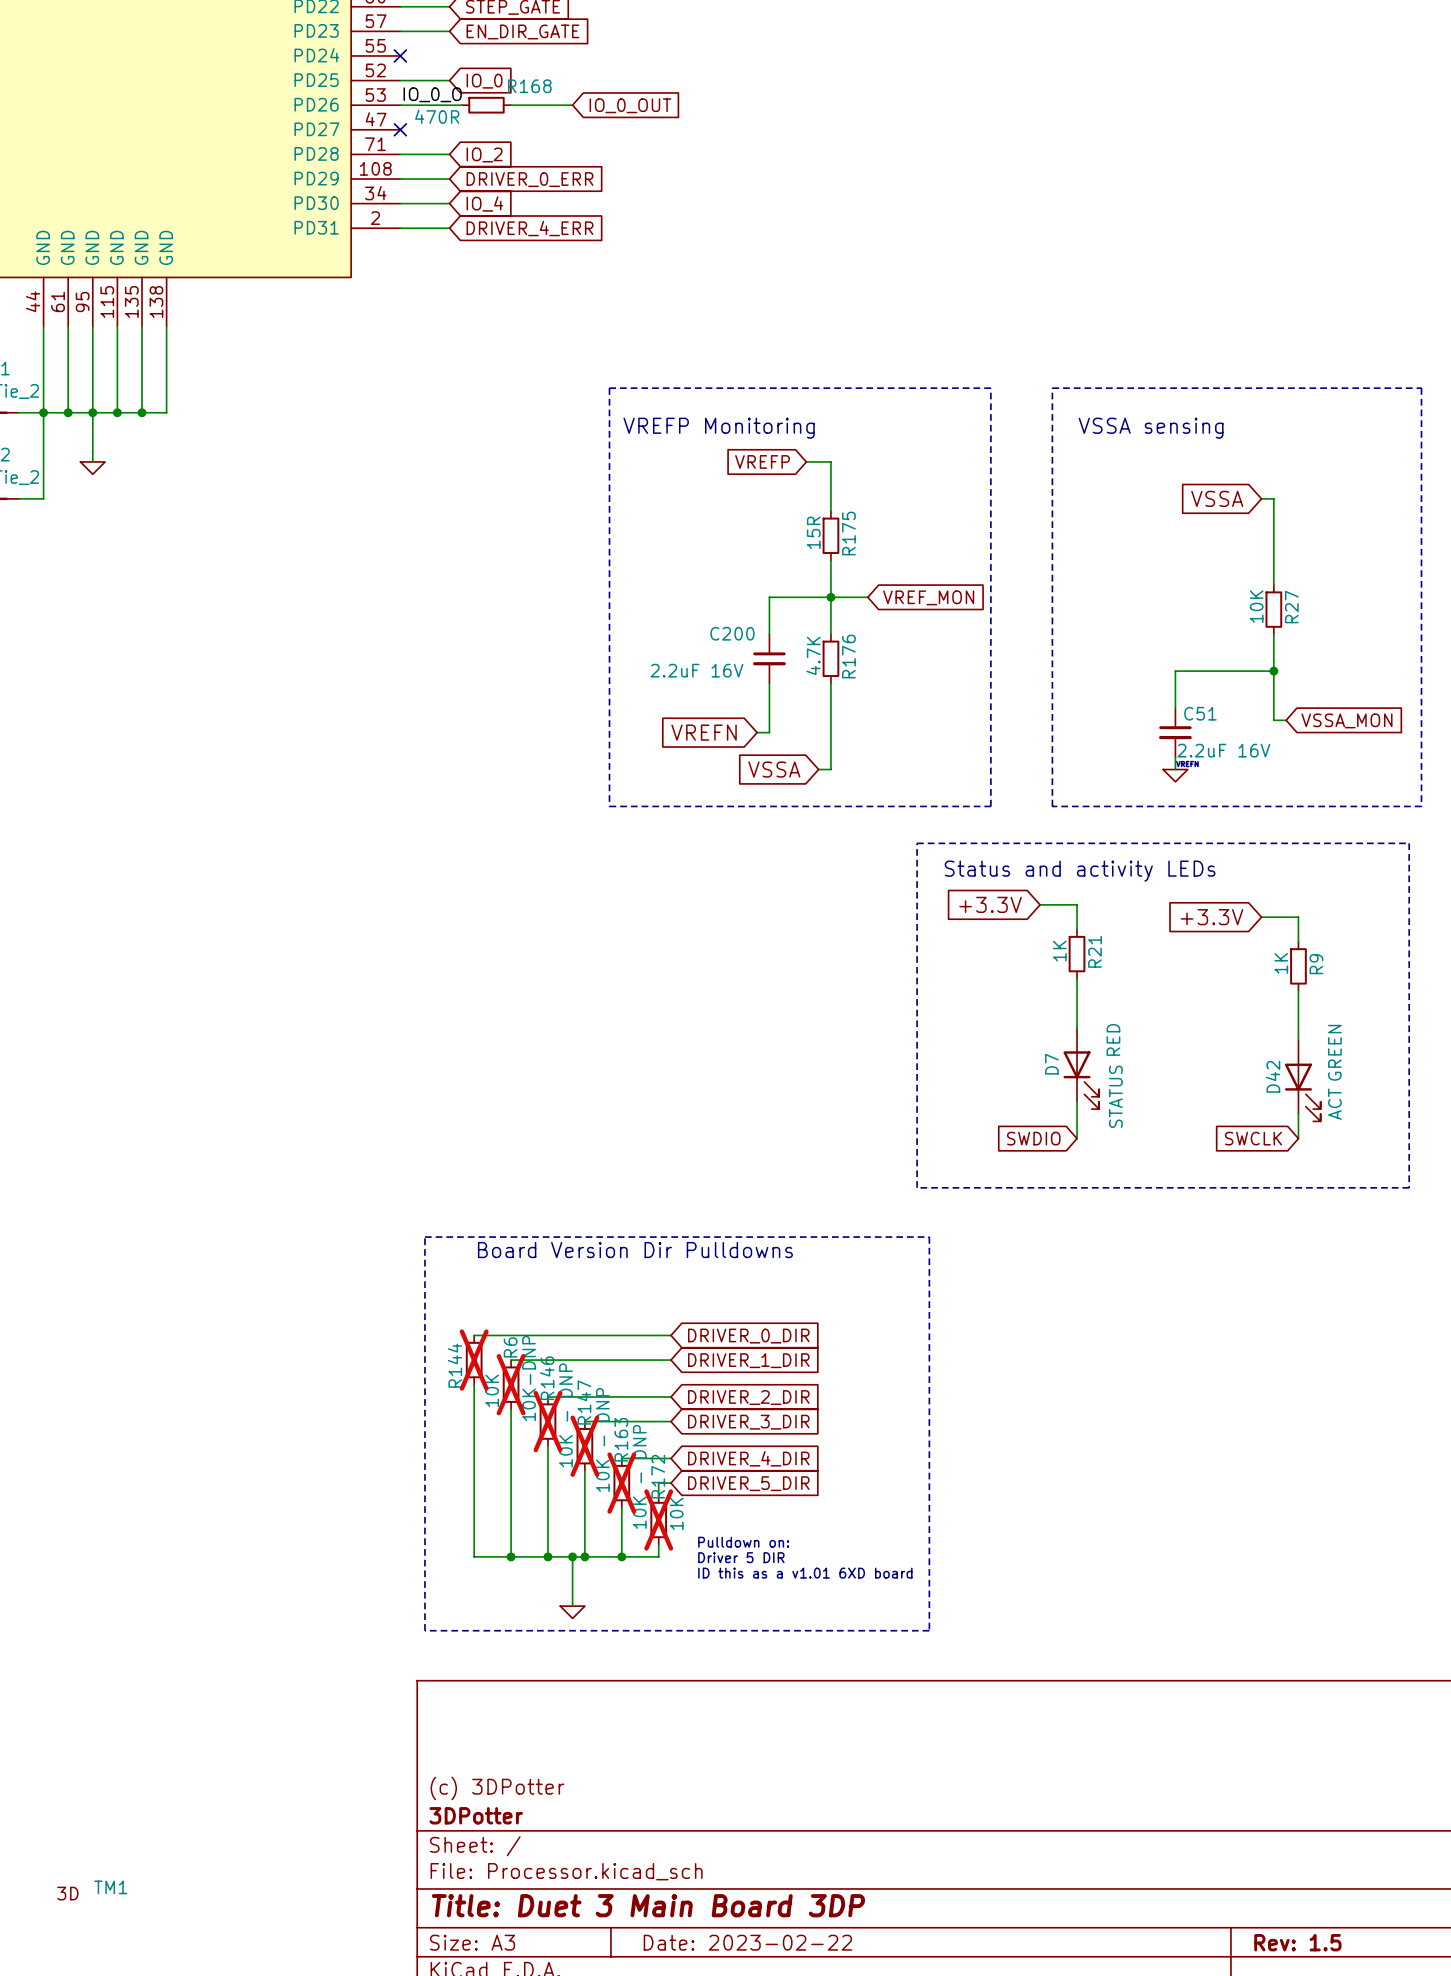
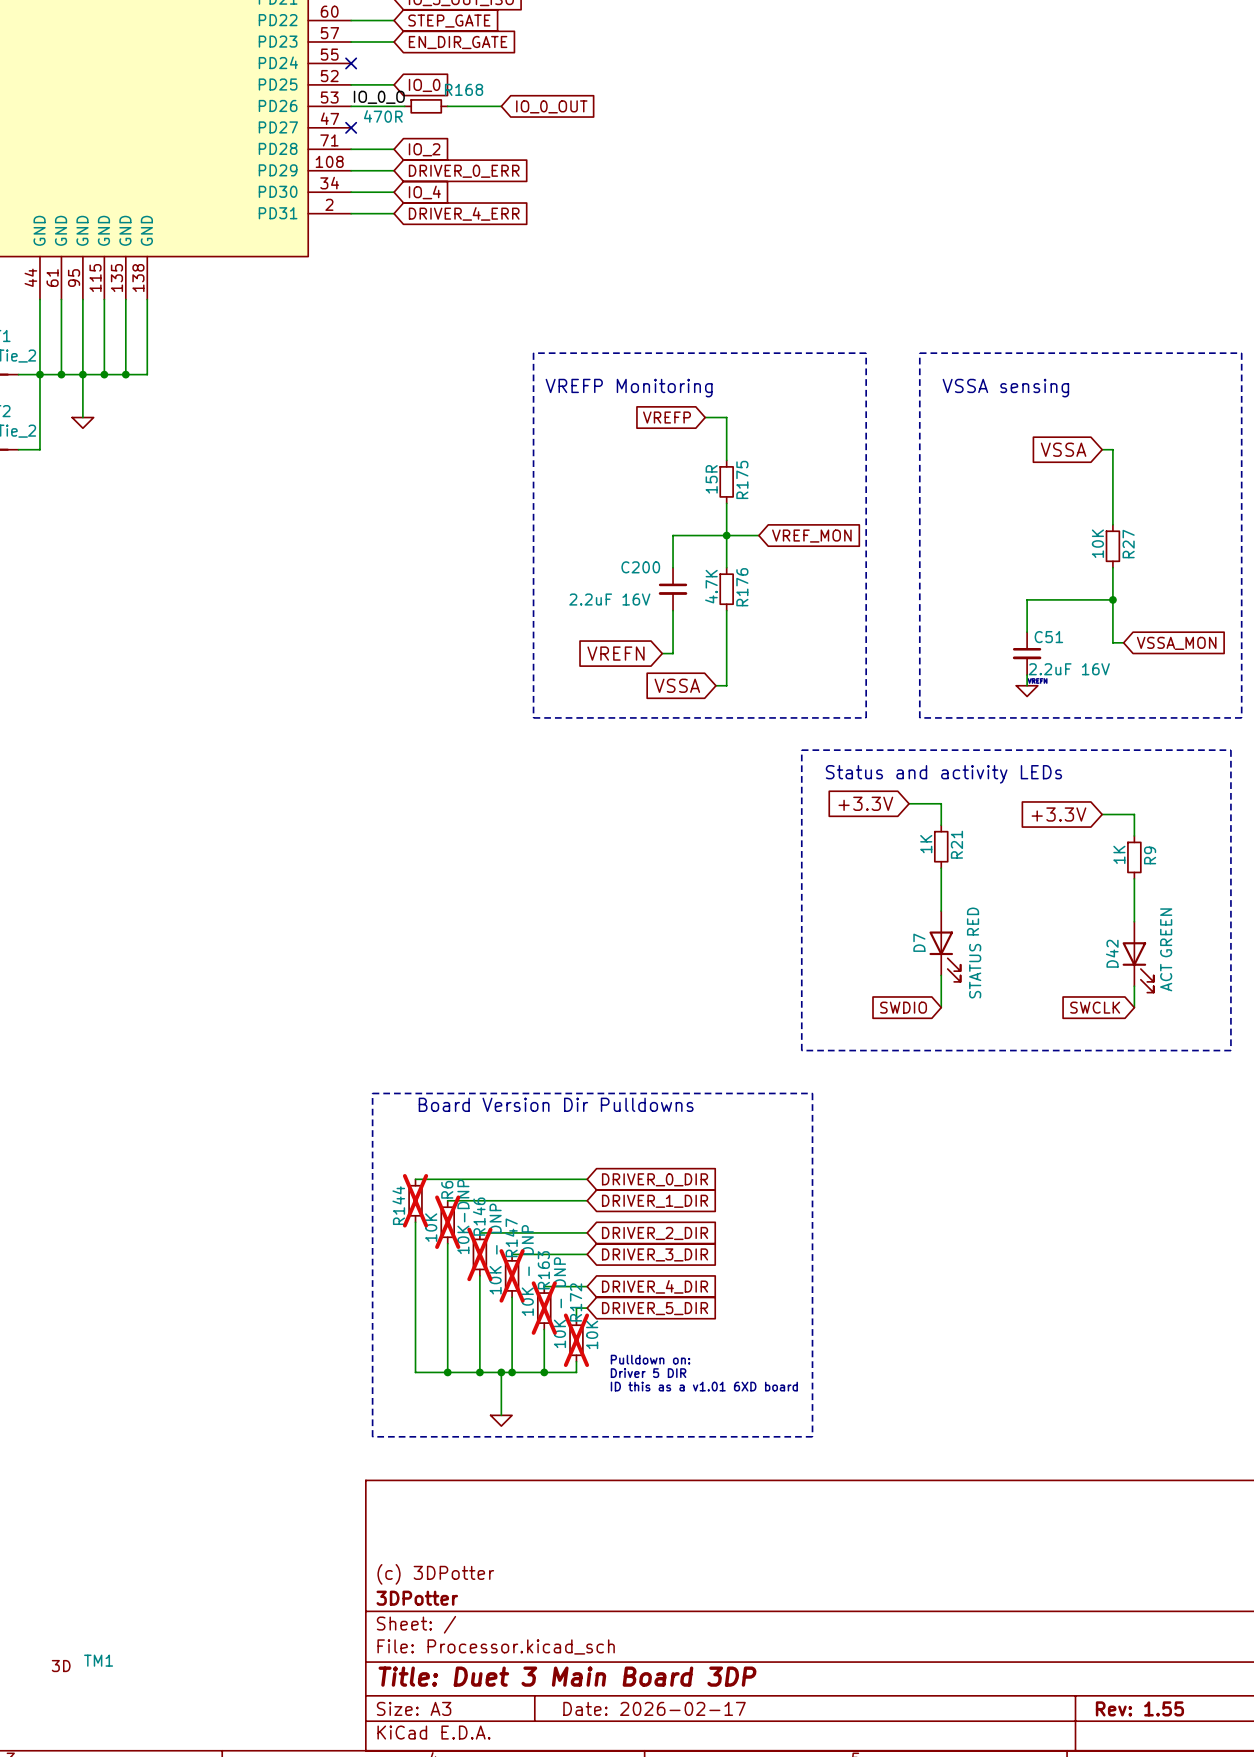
title block: Date: 2023-02-22 (747, 1942) -> Date: 2026-02-17 (654, 1708)
title block: Rev: 1.5 (1297, 1942) -> Rev: 1.55 (1139, 1708)

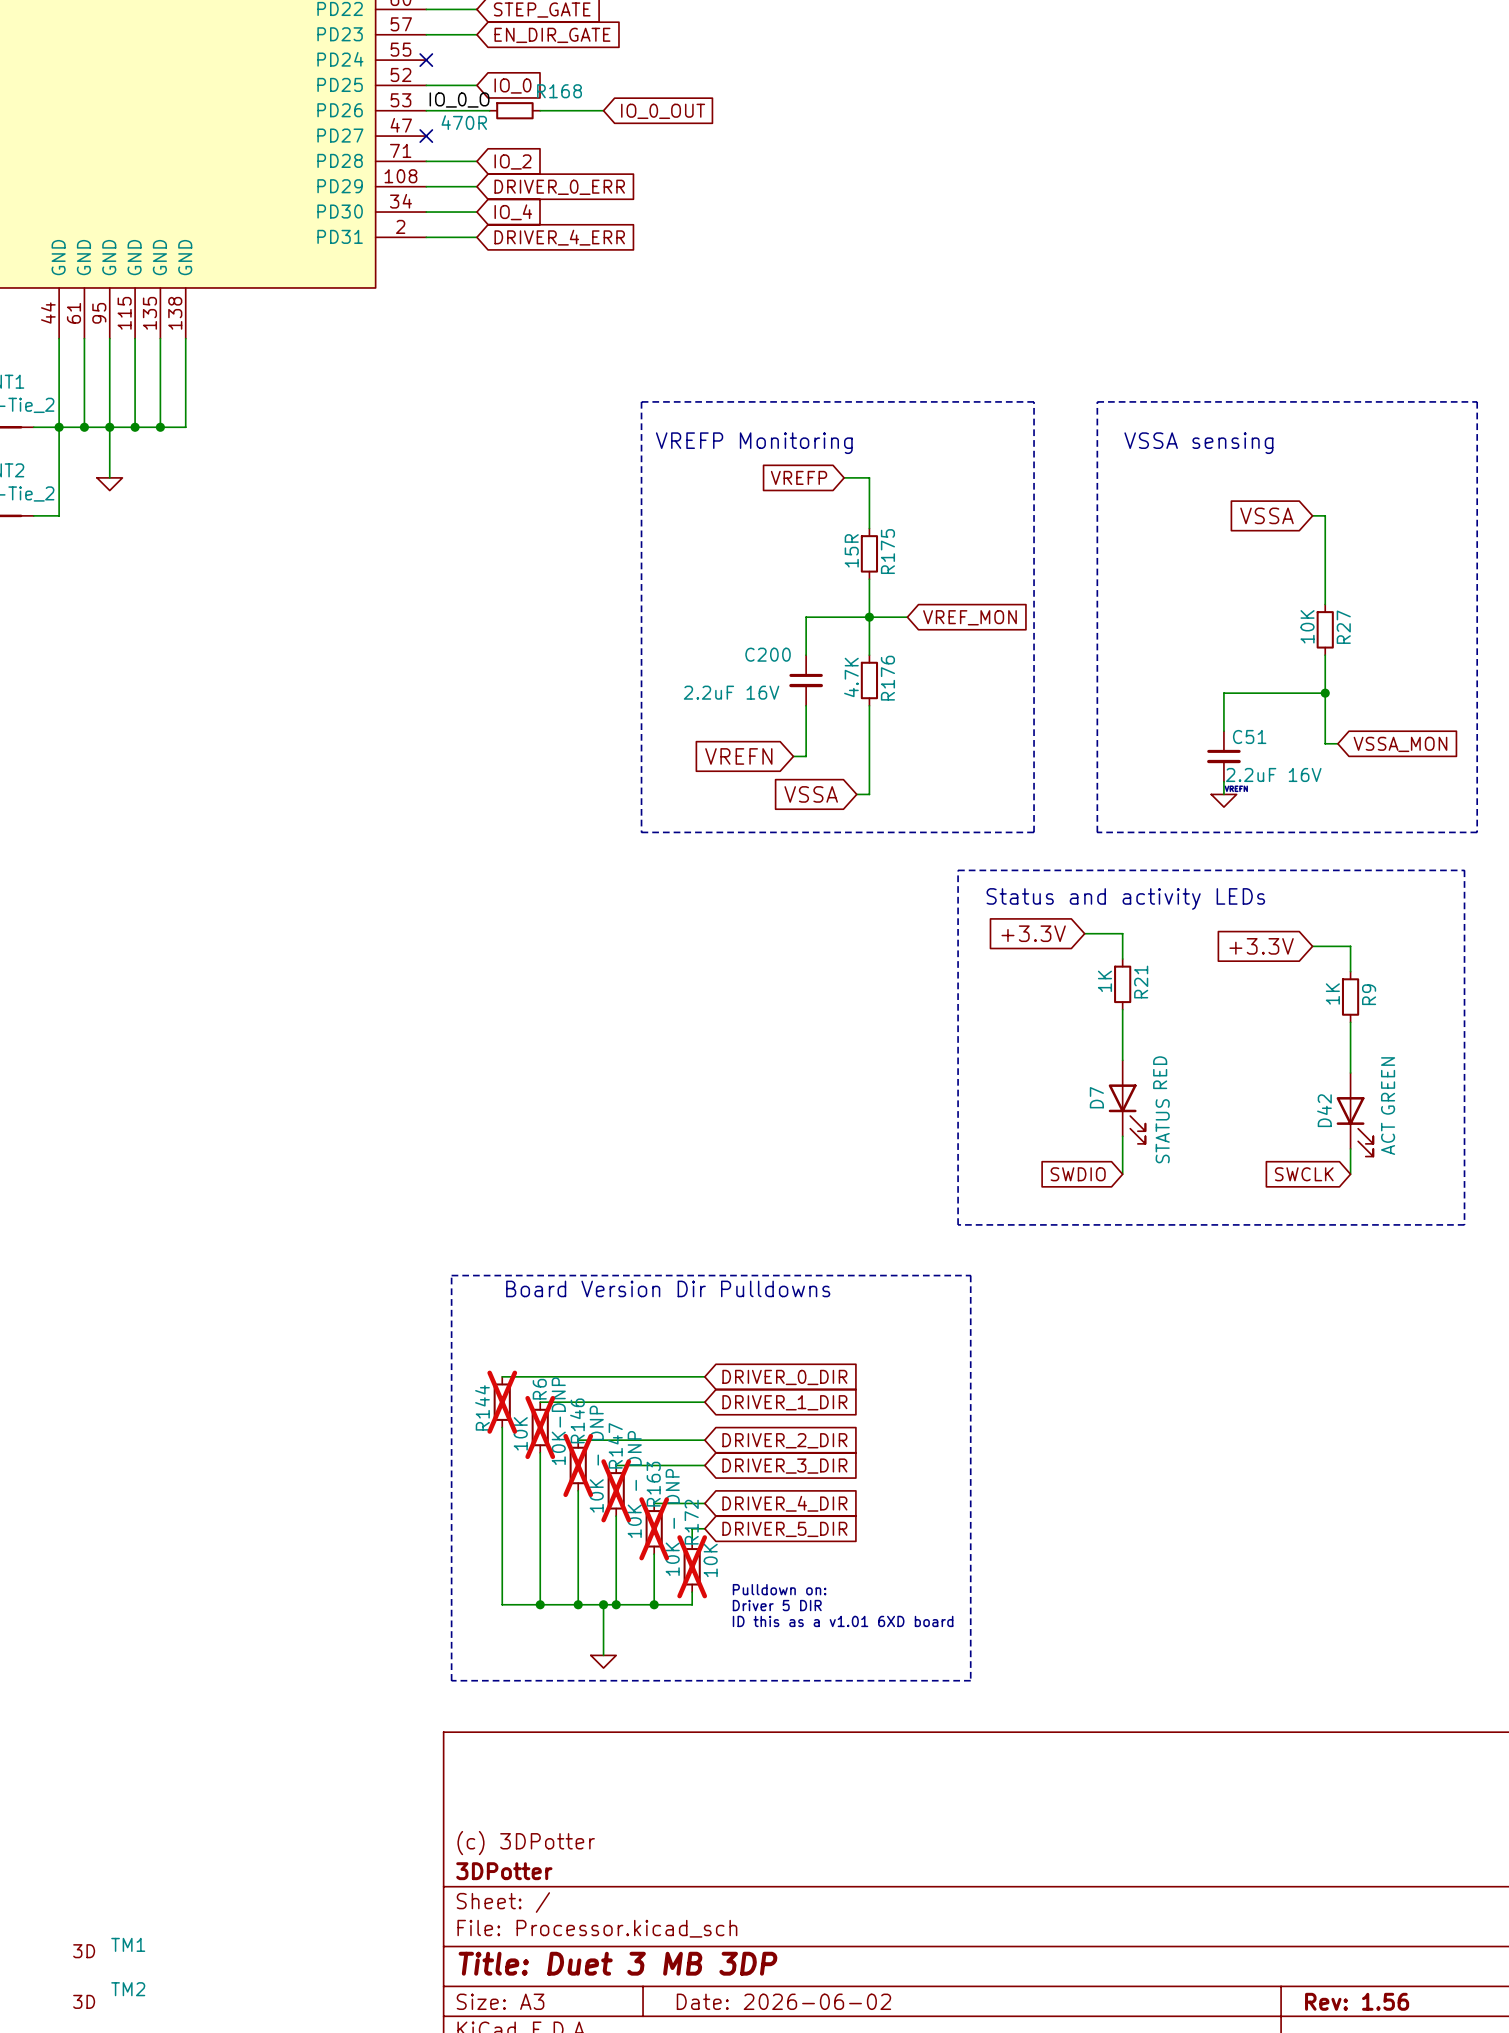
title block: Title: Duet 3 Main Board 3DP (567, 1676) -> Title: Duet 3 MB 3DP (617, 1963)
TM2: none -> (109, 1995)
title block: Date: 2026-02-17 (654, 1708) -> Date: 2026-06-02 (783, 2001)
title block: Rev: 1.55 (1139, 1708) -> Rev: 1.56 (1357, 2001)

